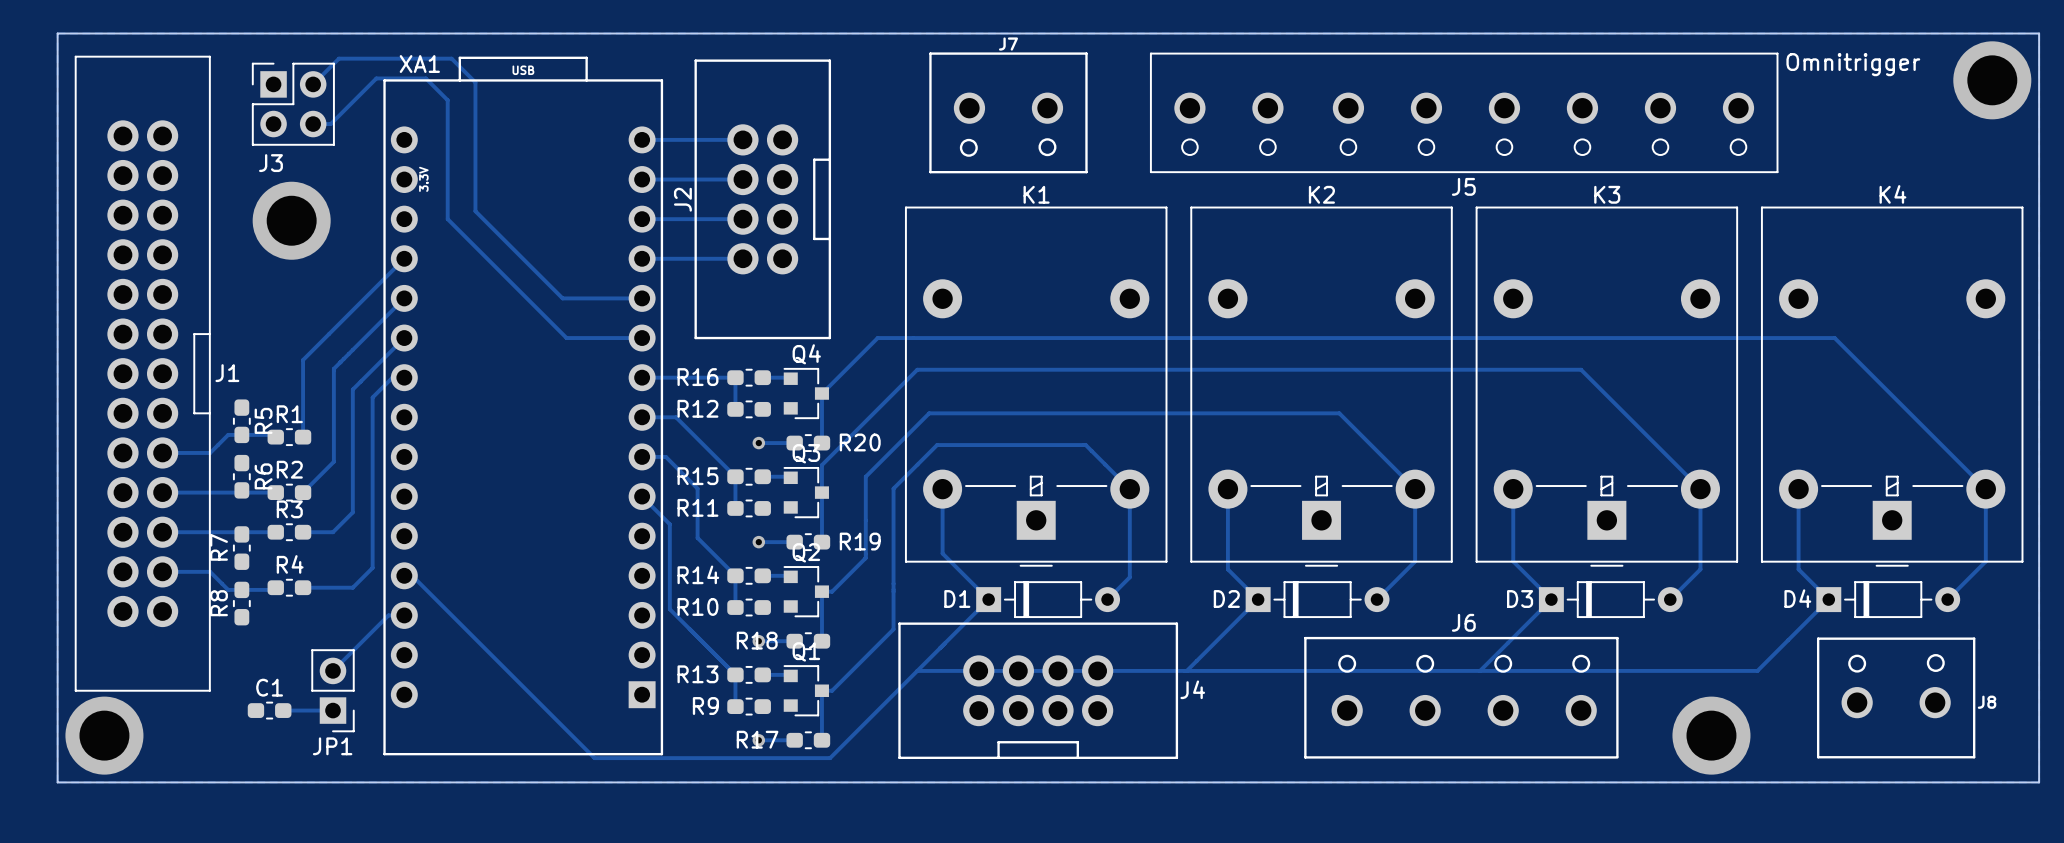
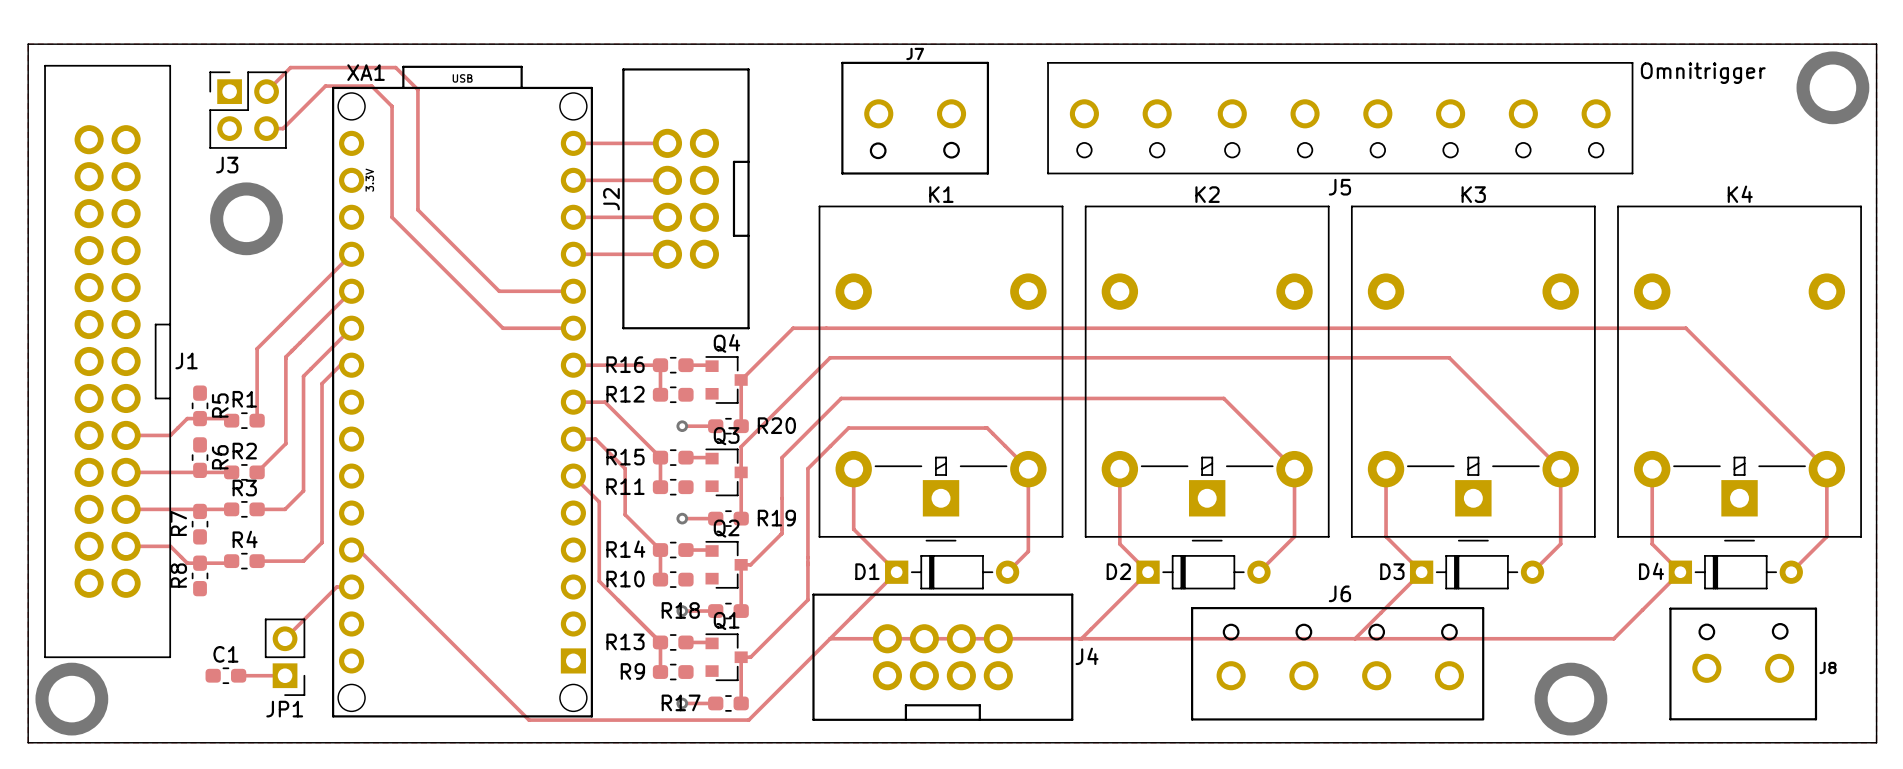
XA1 footprint: [383, 56, 664, 756] -> [332, 65, 593, 718]

